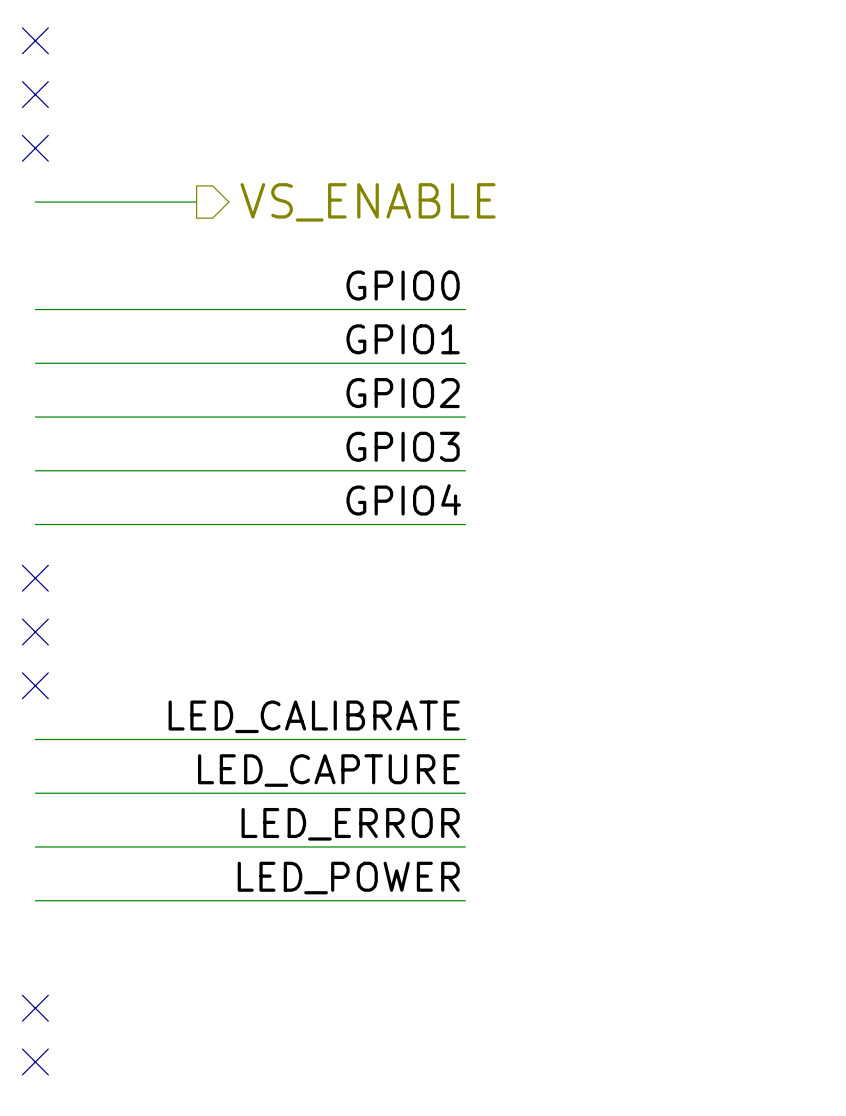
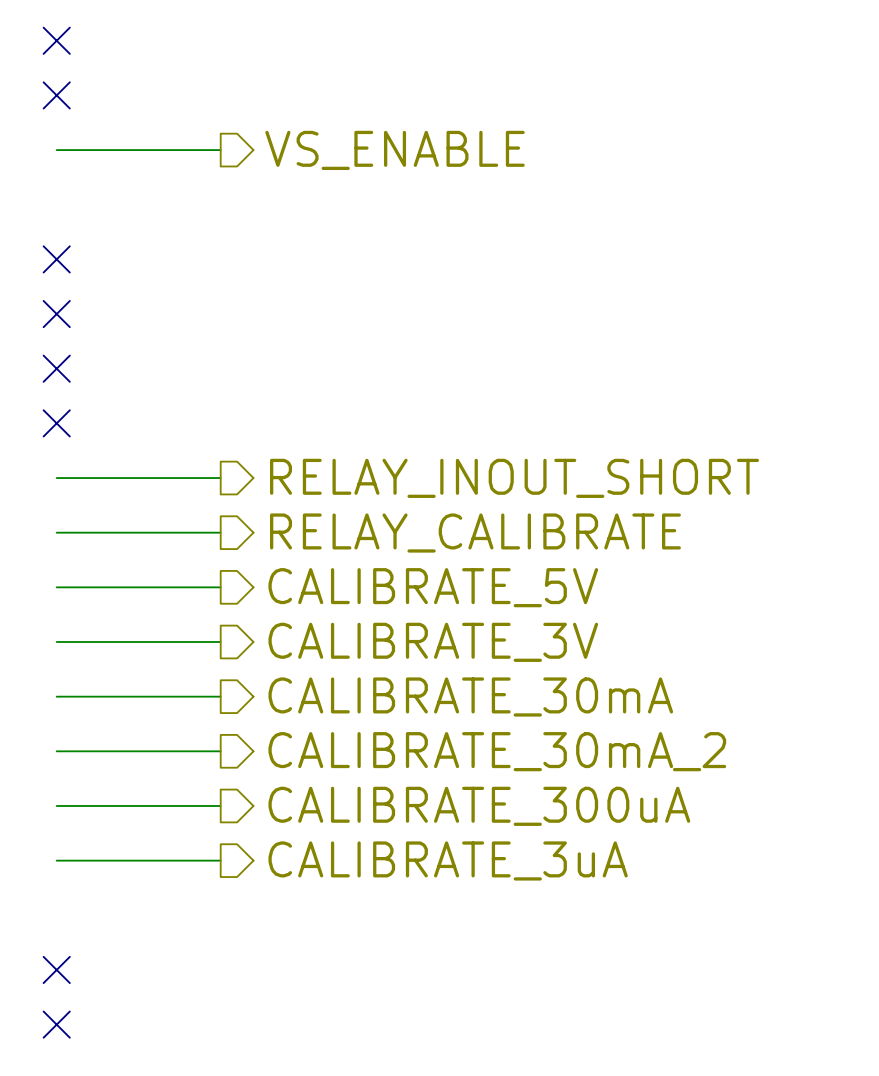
label: GPIO0 (403, 285) -> none
wire: (35, 309) (465, 309) -> none
no-connect mark: none -> (56, 259)
label: GPIO1 (403, 339) -> none
wire: (35, 363) (465, 363) -> none
no-connect mark: none -> (56, 314)
label: GPIO2 (403, 393) -> none
wire: (35, 417) (465, 417) -> none
no-connect mark: none -> (56, 368)
label: GPIO3 (403, 446) -> none
wire: (35, 470) (465, 470) -> none
no-connect mark: none -> (56, 423)
label: GPIO4 (403, 499) -> none
wire: (196, 524) (465, 524) -> none
hierarchical label: none -> RELAY_INOUT_SHORT (514, 478)
wire: none -> (56, 532) (220, 532)
no-connect mark: (35, 578) -> none
hierarchical label: none -> RELAY_CALIBRATE (475, 533)
wire: none -> (56, 587) (220, 587)
no-connect mark: (35, 632) -> none
hierarchical label: none -> CALIBRATE_5V (433, 587)
wire: none -> (56, 642) (220, 642)
no-connect mark: (35, 685) -> none
hierarchical label: none -> CALIBRATE_3V (433, 642)
label: LED_CALIBRATE (314, 716) -> none
wire: (196, 739) (465, 739) -> none
hierarchical label: none -> CALIBRATE_30mA (470, 697)
label: LED_CAPTURE (328, 770) -> none
wire: (196, 793) (465, 793) -> none
hierarchical label: none -> CALIBRATE_30mA_2 (497, 751)
label: LED_ERROR (350, 824) -> none
wire: (196, 846) (465, 846) -> none
hierarchical label: none -> CALIBRATE_300uA (479, 806)
label: LED_POWER (348, 878) -> none
wire: (196, 900) (465, 900) -> none
hierarchical label: none -> CALIBRATE_3uA (448, 860)

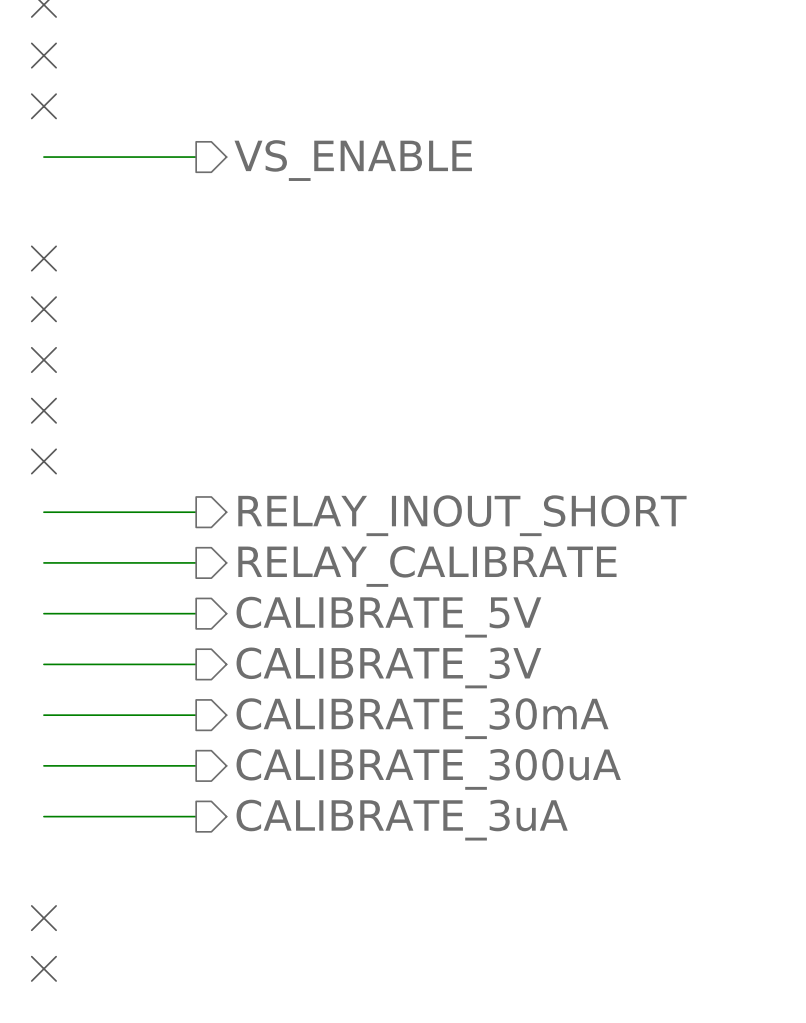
wire: (56, 478) (220, 478) -> none
no-connect mark: none -> (43, 461)
hierarchical label: RELAY_INOUT_SHORT (514, 478) -> none
hierarchical label: RELAY_CALIBRATE (475, 533) -> RELAY_INOUT_SHORT (462, 515)
hierarchical label: CALIBRATE_5V (433, 587) -> RELAY_CALIBRATE (427, 566)
hierarchical label: CALIBRATE_3V (433, 642) -> CALIBRATE_5V (388, 617)
hierarchical label: CALIBRATE_30mA (470, 697) -> CALIBRATE_3V (388, 667)
hierarchical label: CALIBRATE_30mA_2 (497, 751) -> CALIBRATE_30mA (422, 718)

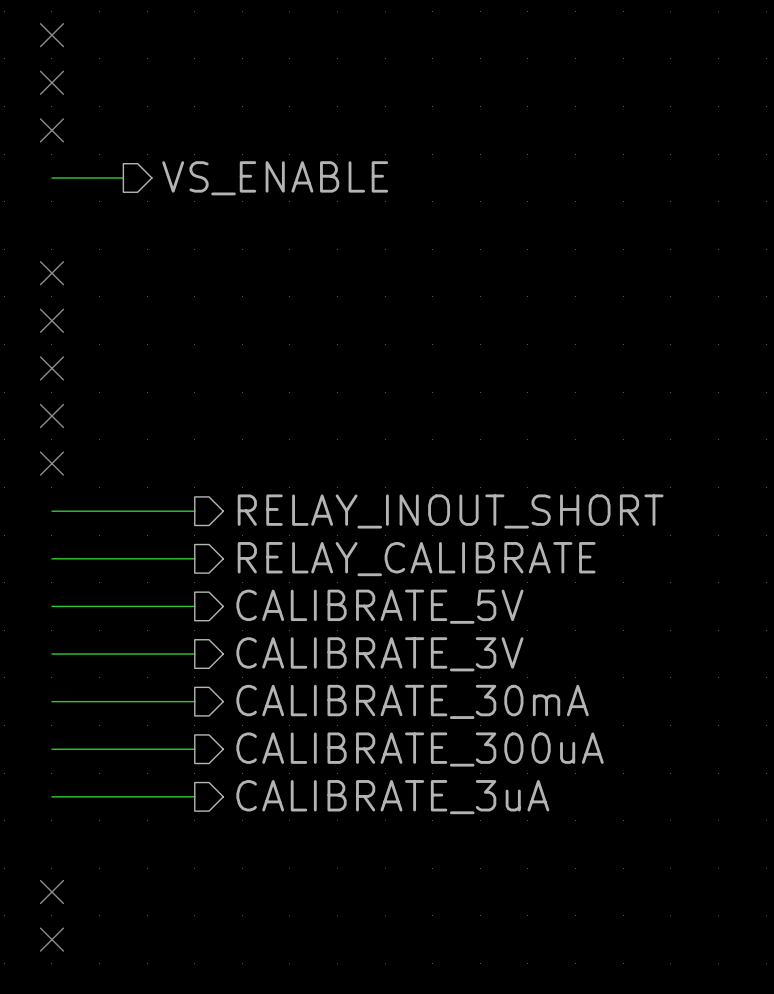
wire: (120, 157) (196, 157) -> none
hierarchical label position: VS_ENABLE (353, 160) -> VS_ENABLE (275, 178)

